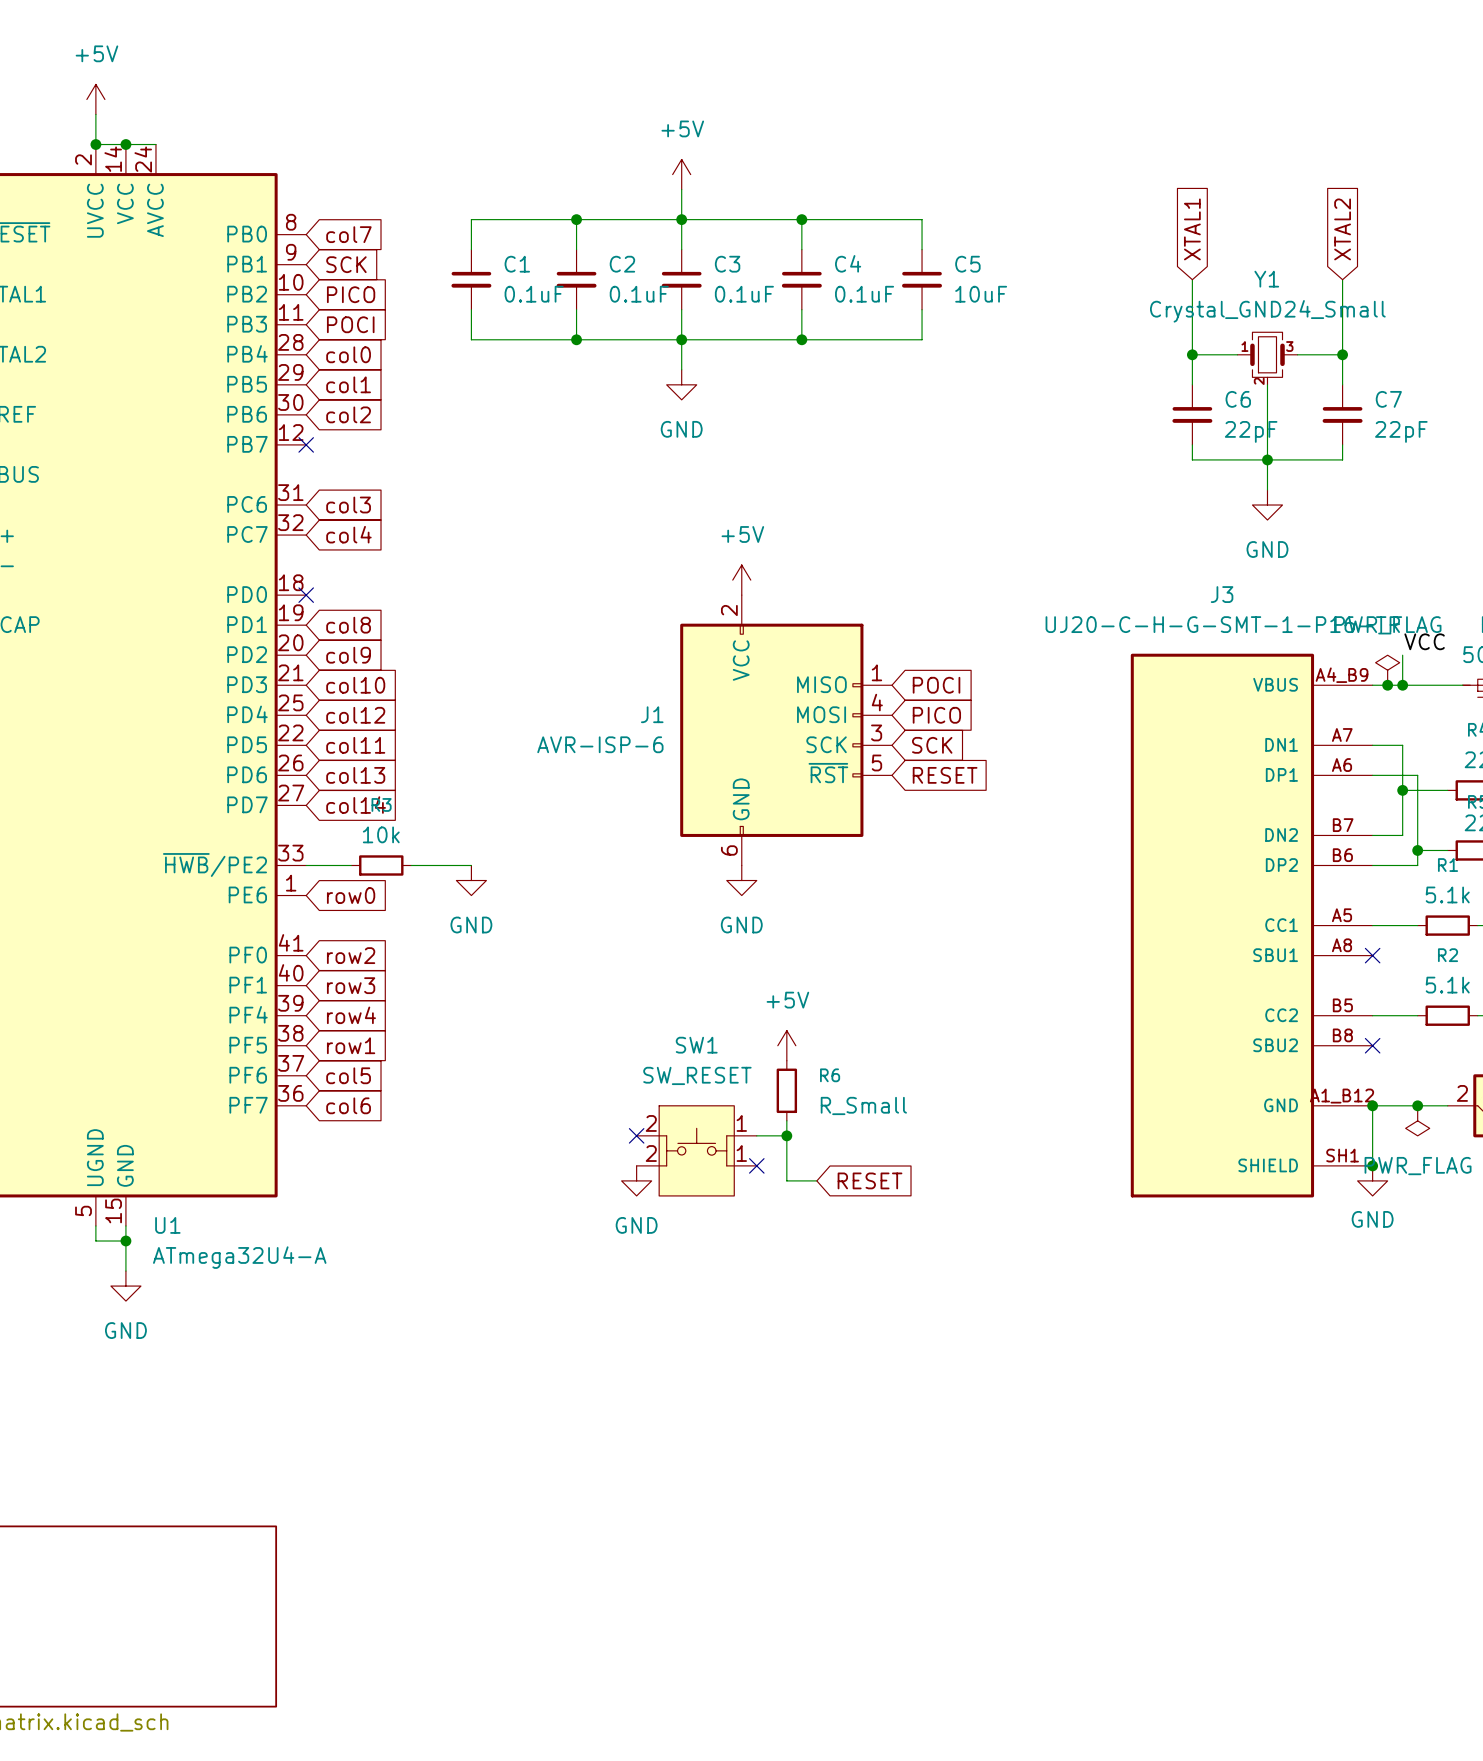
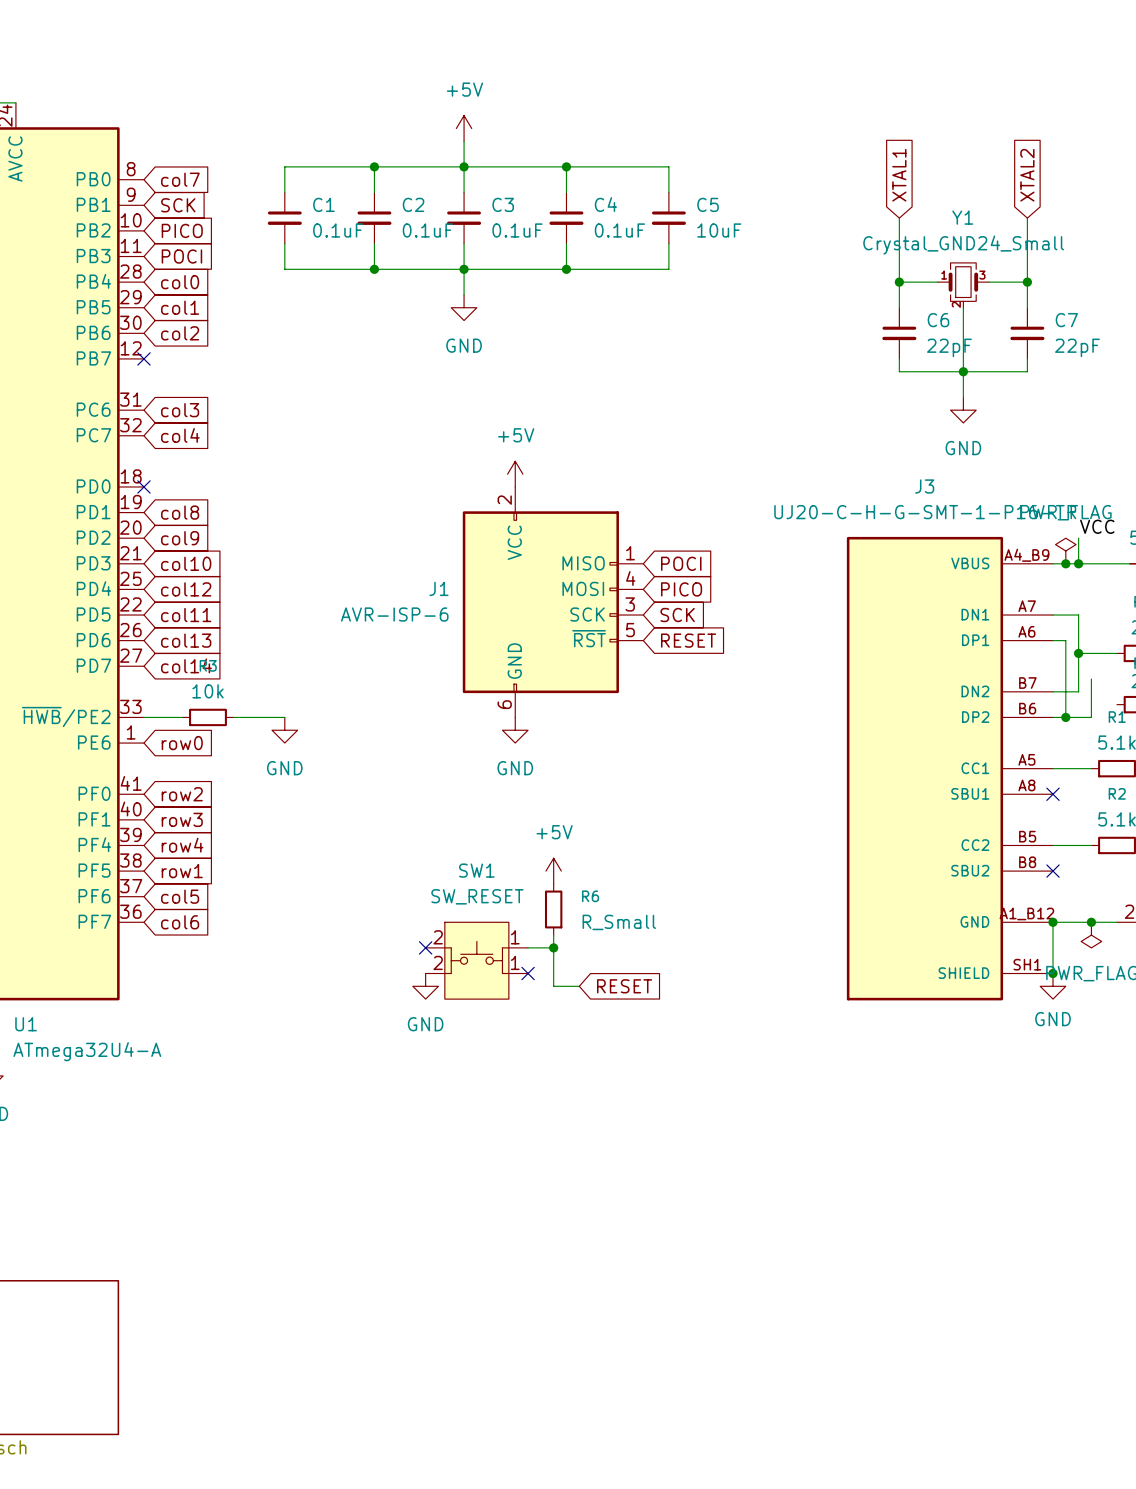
wire: (1387, 775) (1417, 775) (1417, 820) -> (1065, 640) (1065, 717)
wire: (1417, 850) (1447, 850) -> none
junction position: (1417, 850) -> (1065, 717)

